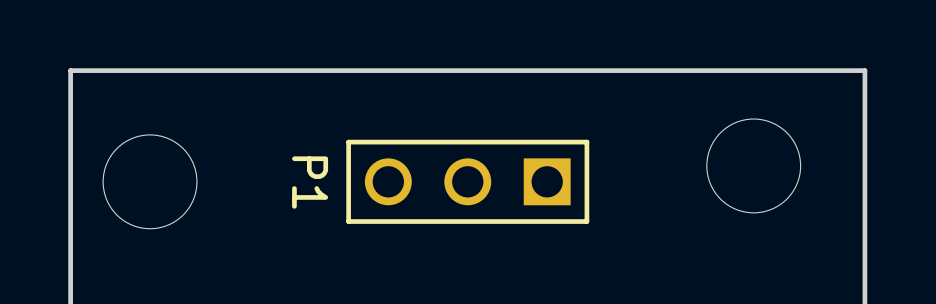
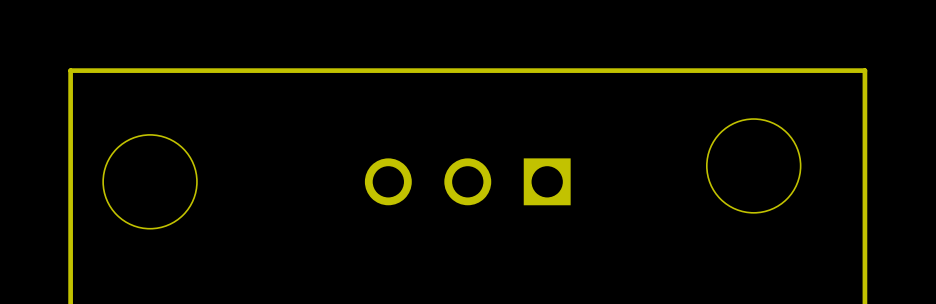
P1 side: bottom (467, 181) -> top (467, 181)

